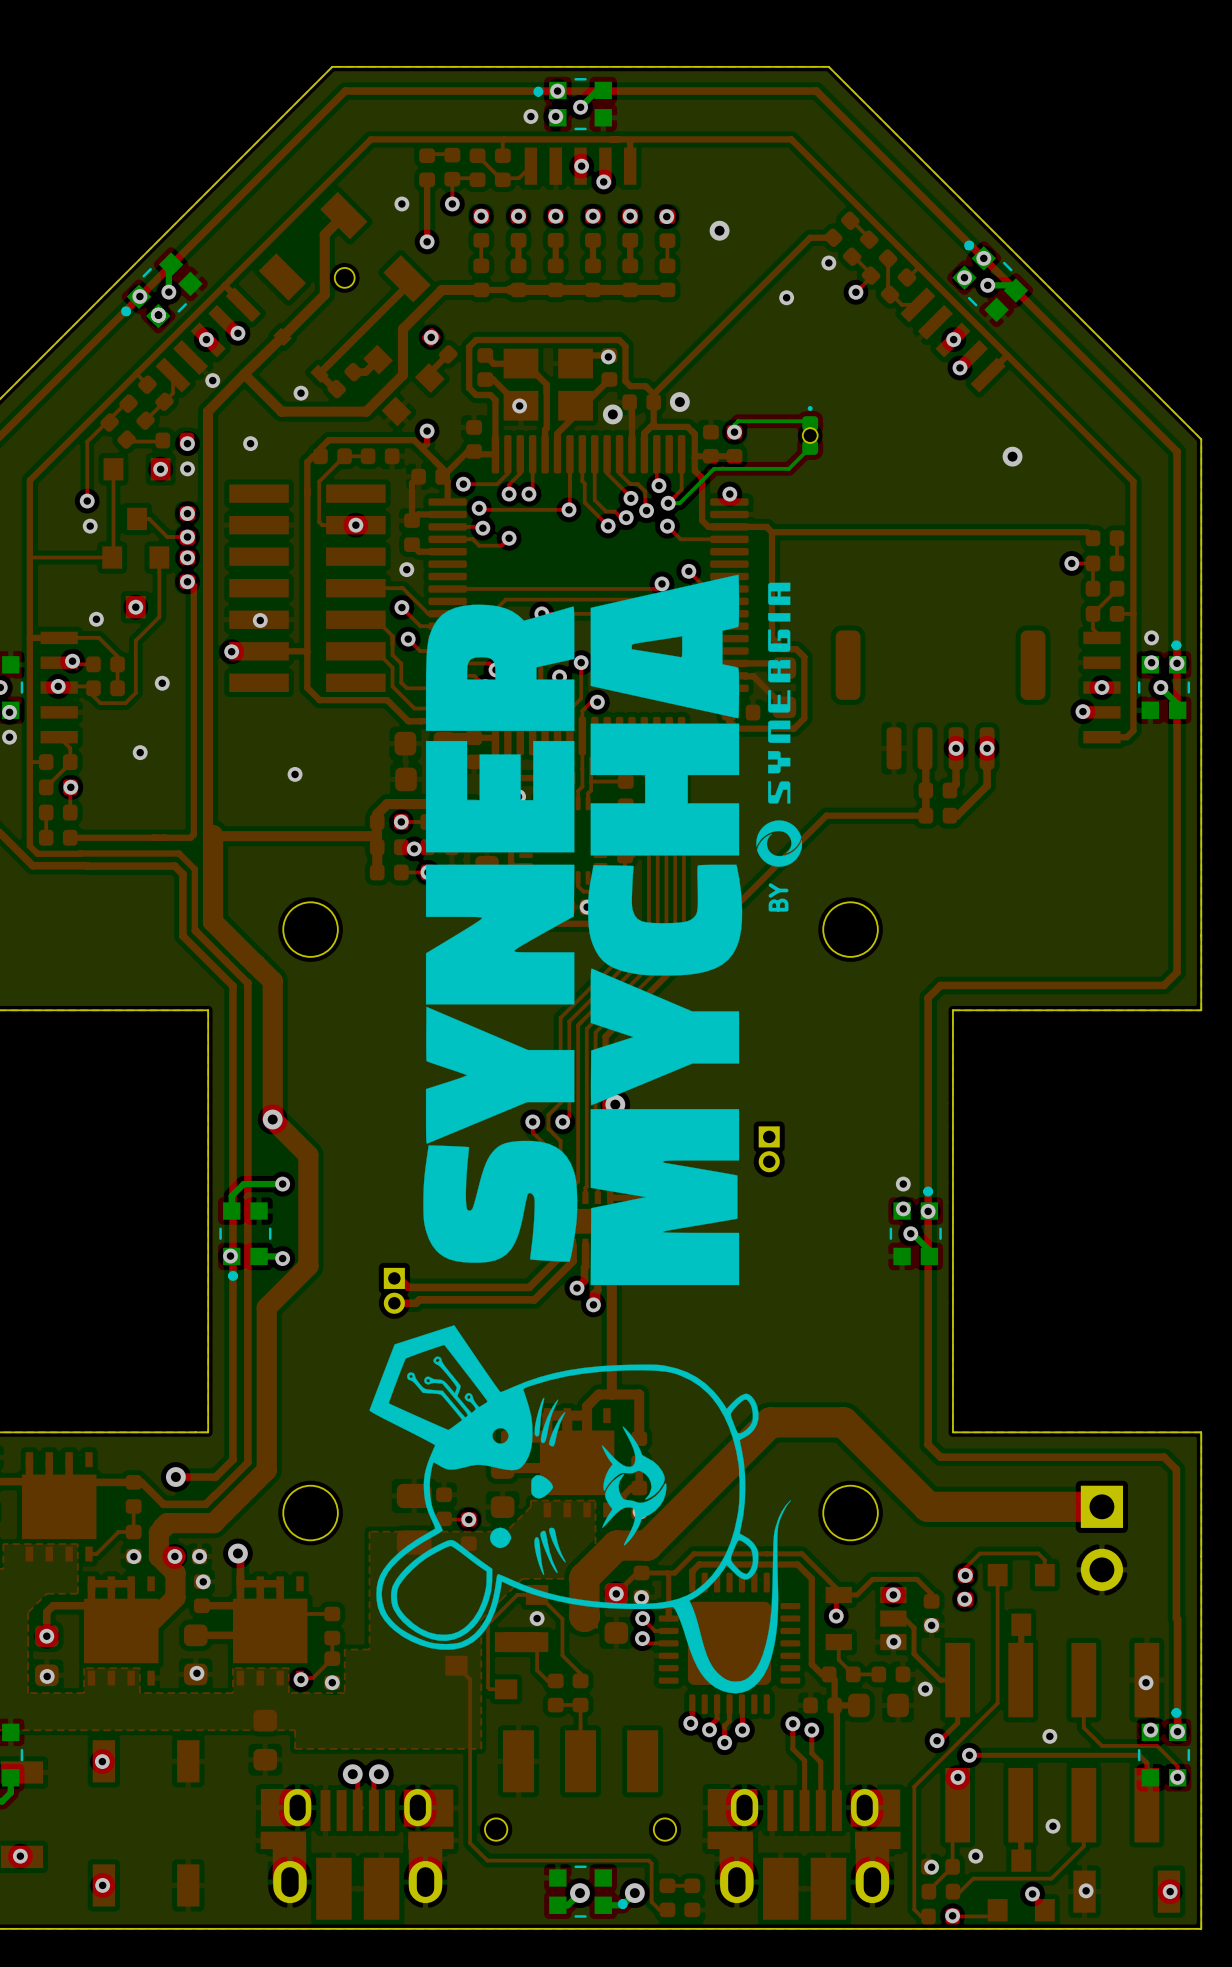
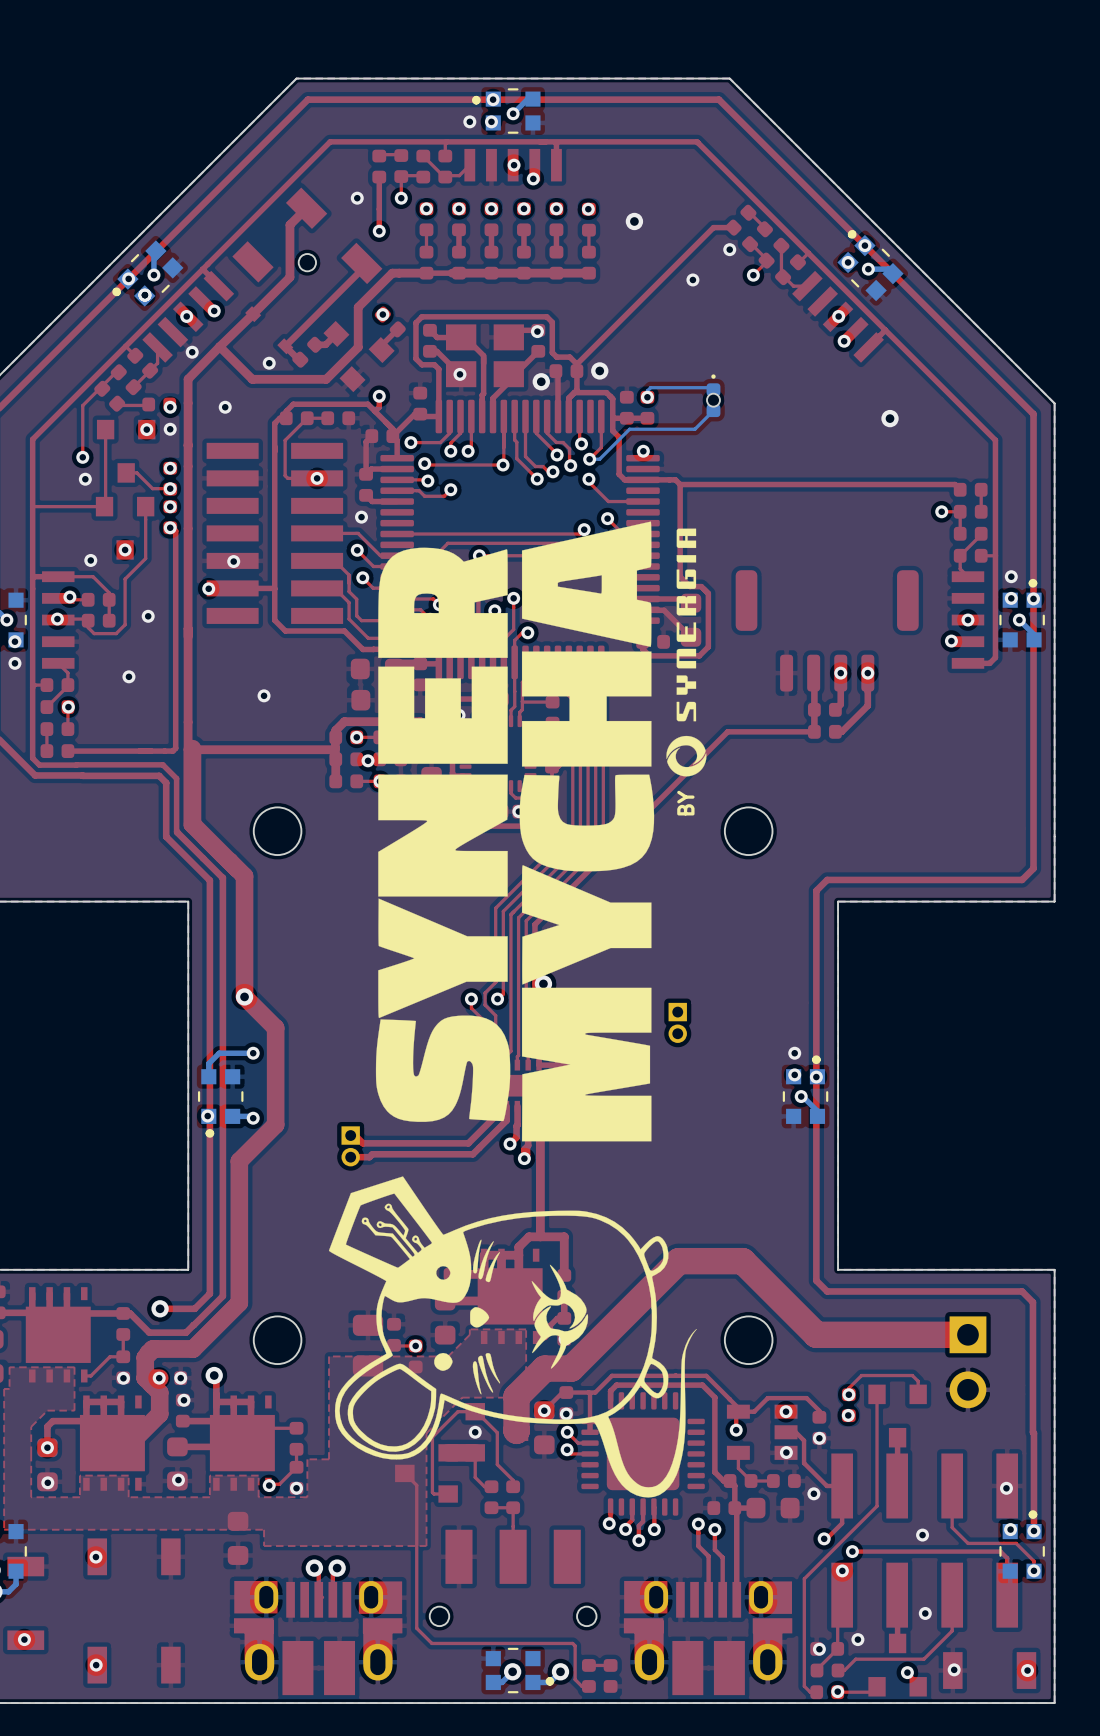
top track: (667, 526) (680, 539) (729, 539) -> none
top track: none -> (588, 482) (608, 501) (643, 501)

